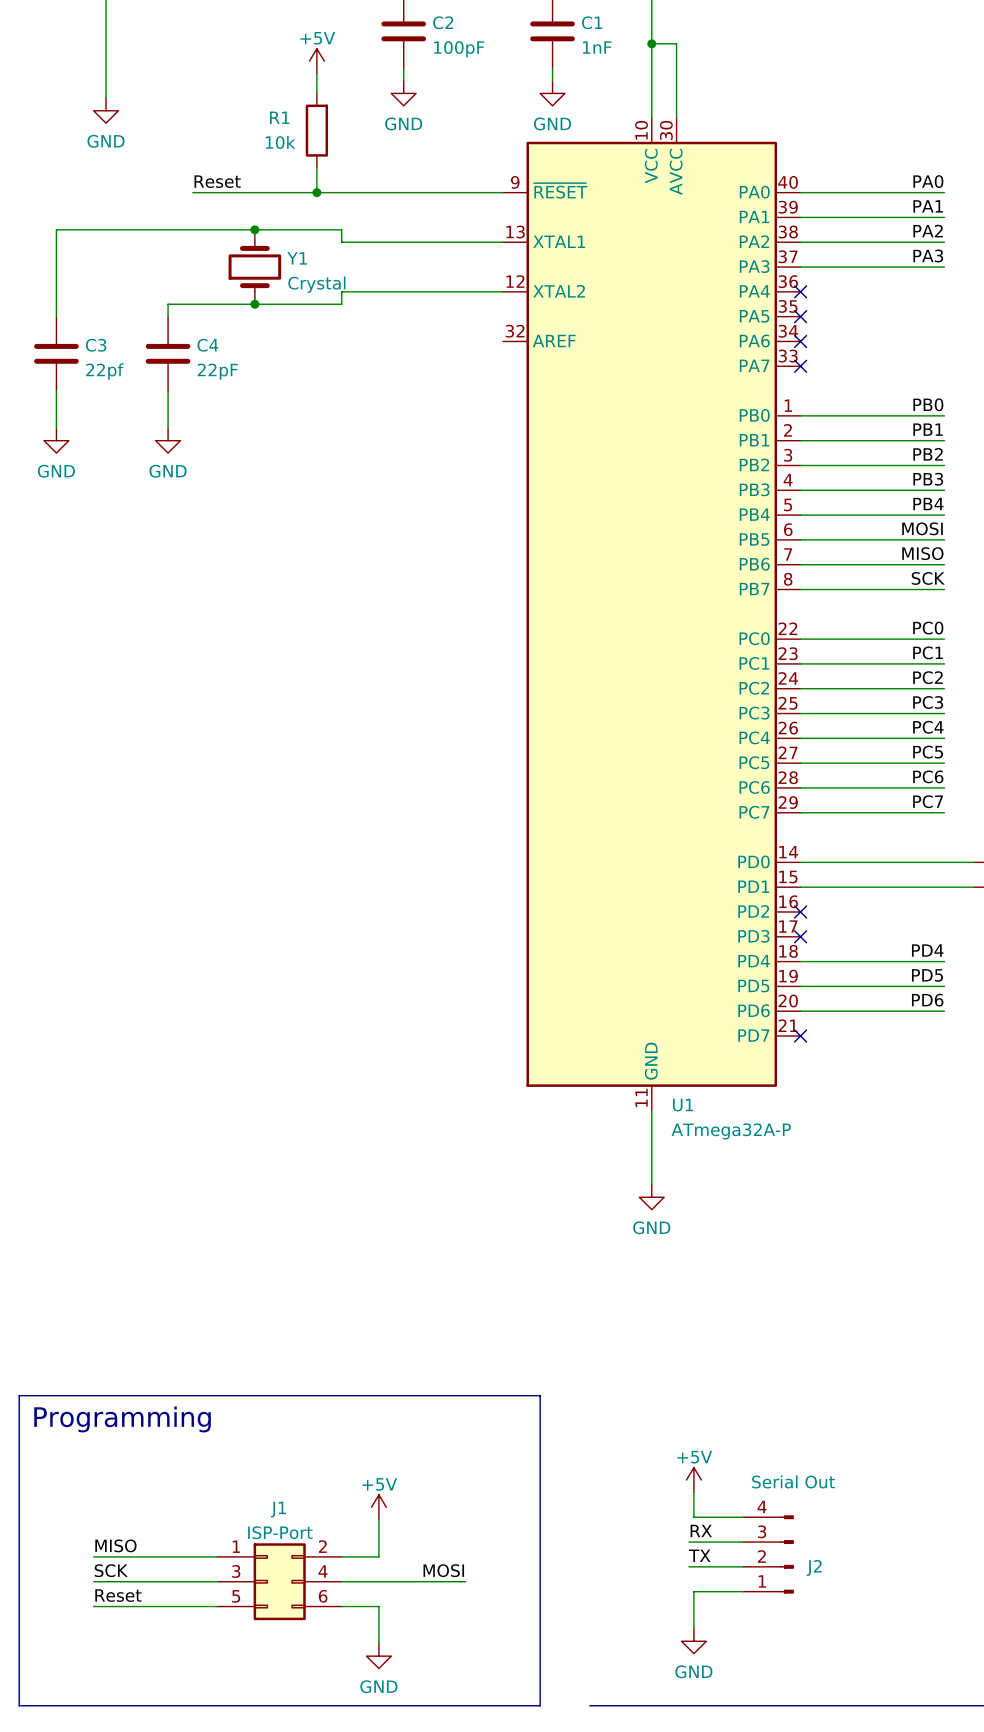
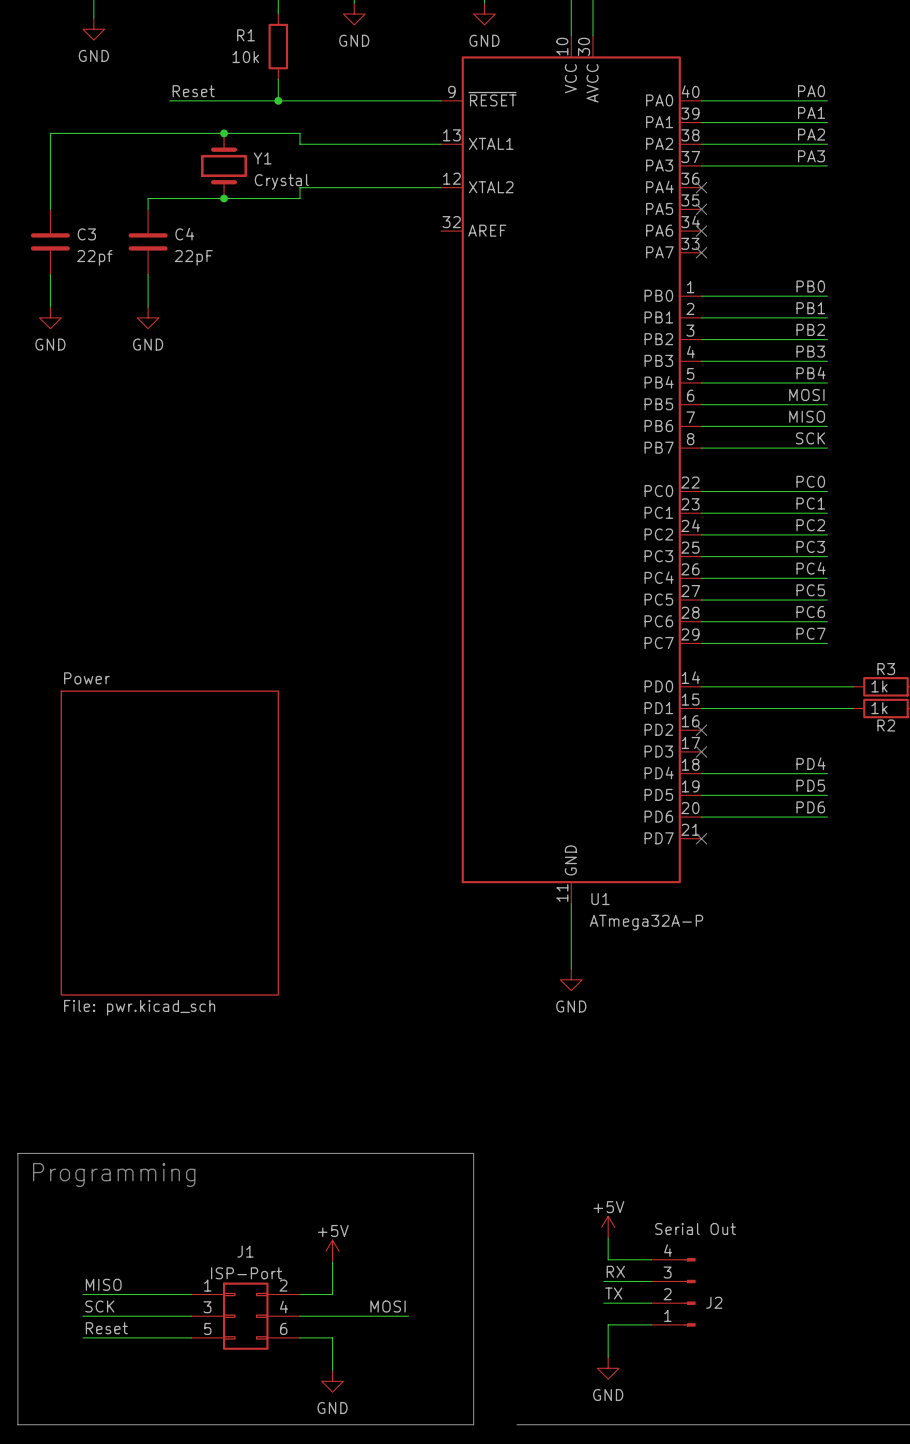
sheet Power: none -> File: pwr.kicad_sch (169, 843)

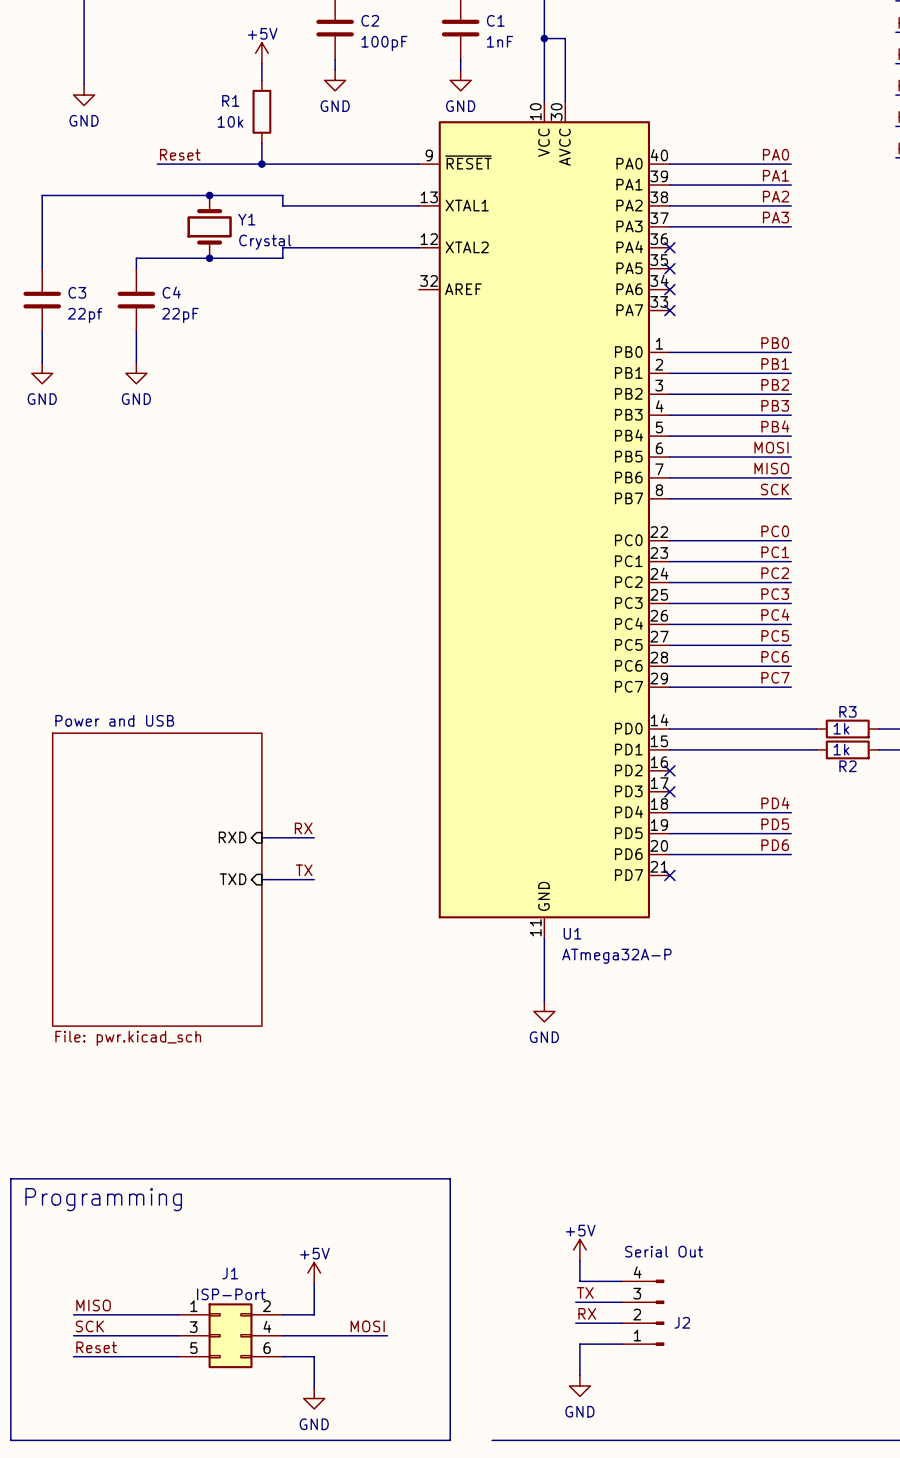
sheet Power name: Power (86, 678) -> Power and USB (114, 720)
label: none -> RX (303, 828)
sheet pin: none -> RXD (232, 837)
wire: none -> (261, 837) (314, 837)
label: none -> TX (304, 870)
sheet pin: none -> TXD (233, 879)
wire: none -> (261, 879) (314, 879)
label: RX (615, 1271) -> TX (585, 1292)
label: TX (613, 1293) -> RX (587, 1313)

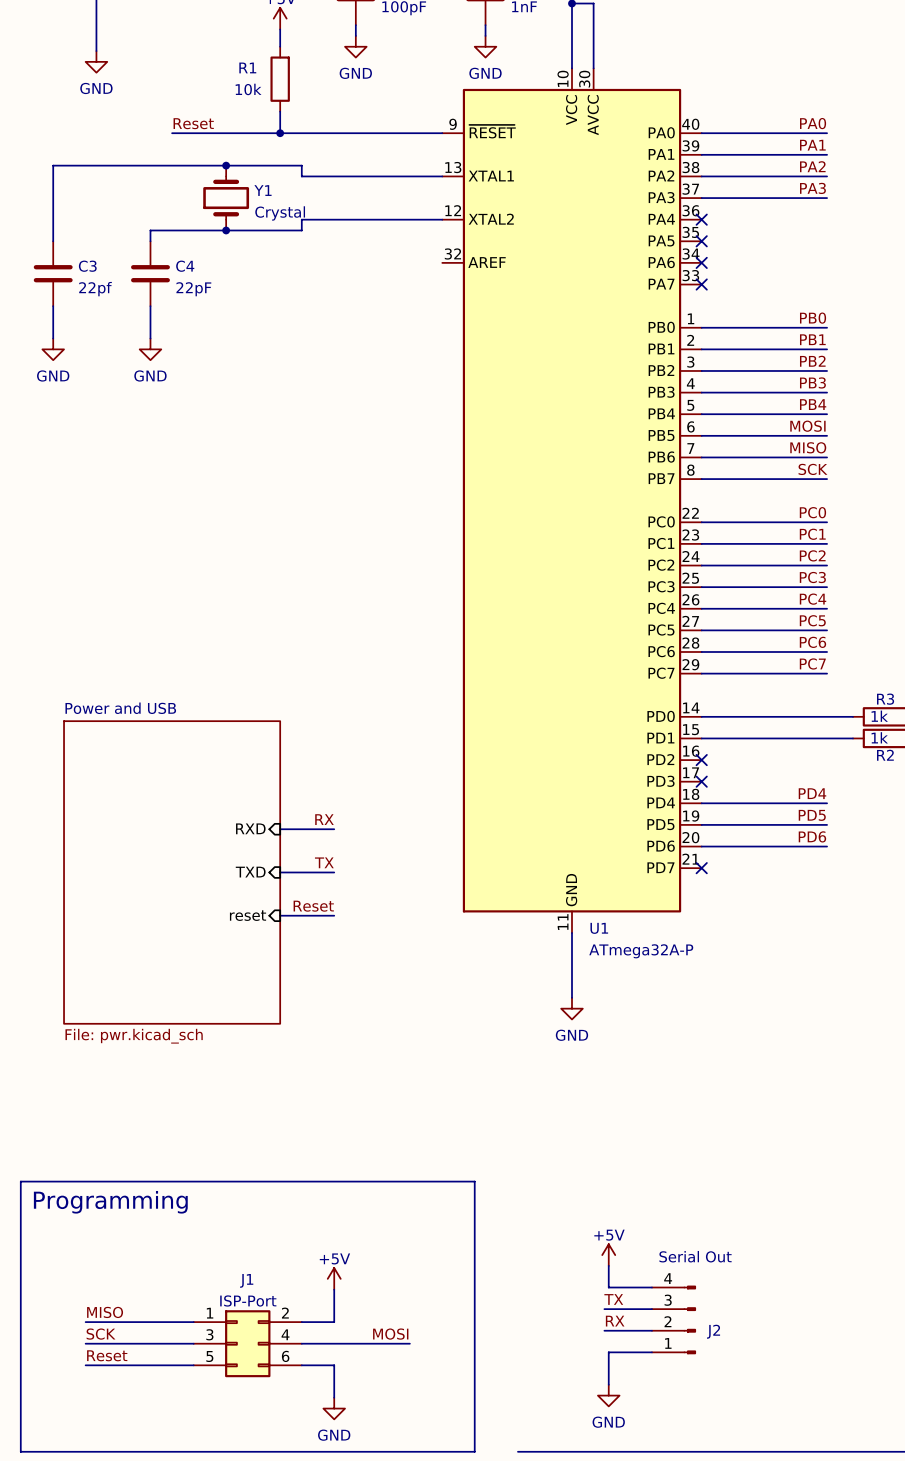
label: none -> Reset (313, 906)
sheet pin: none -> reset (248, 915)
wire: none -> (280, 915) (334, 915)

